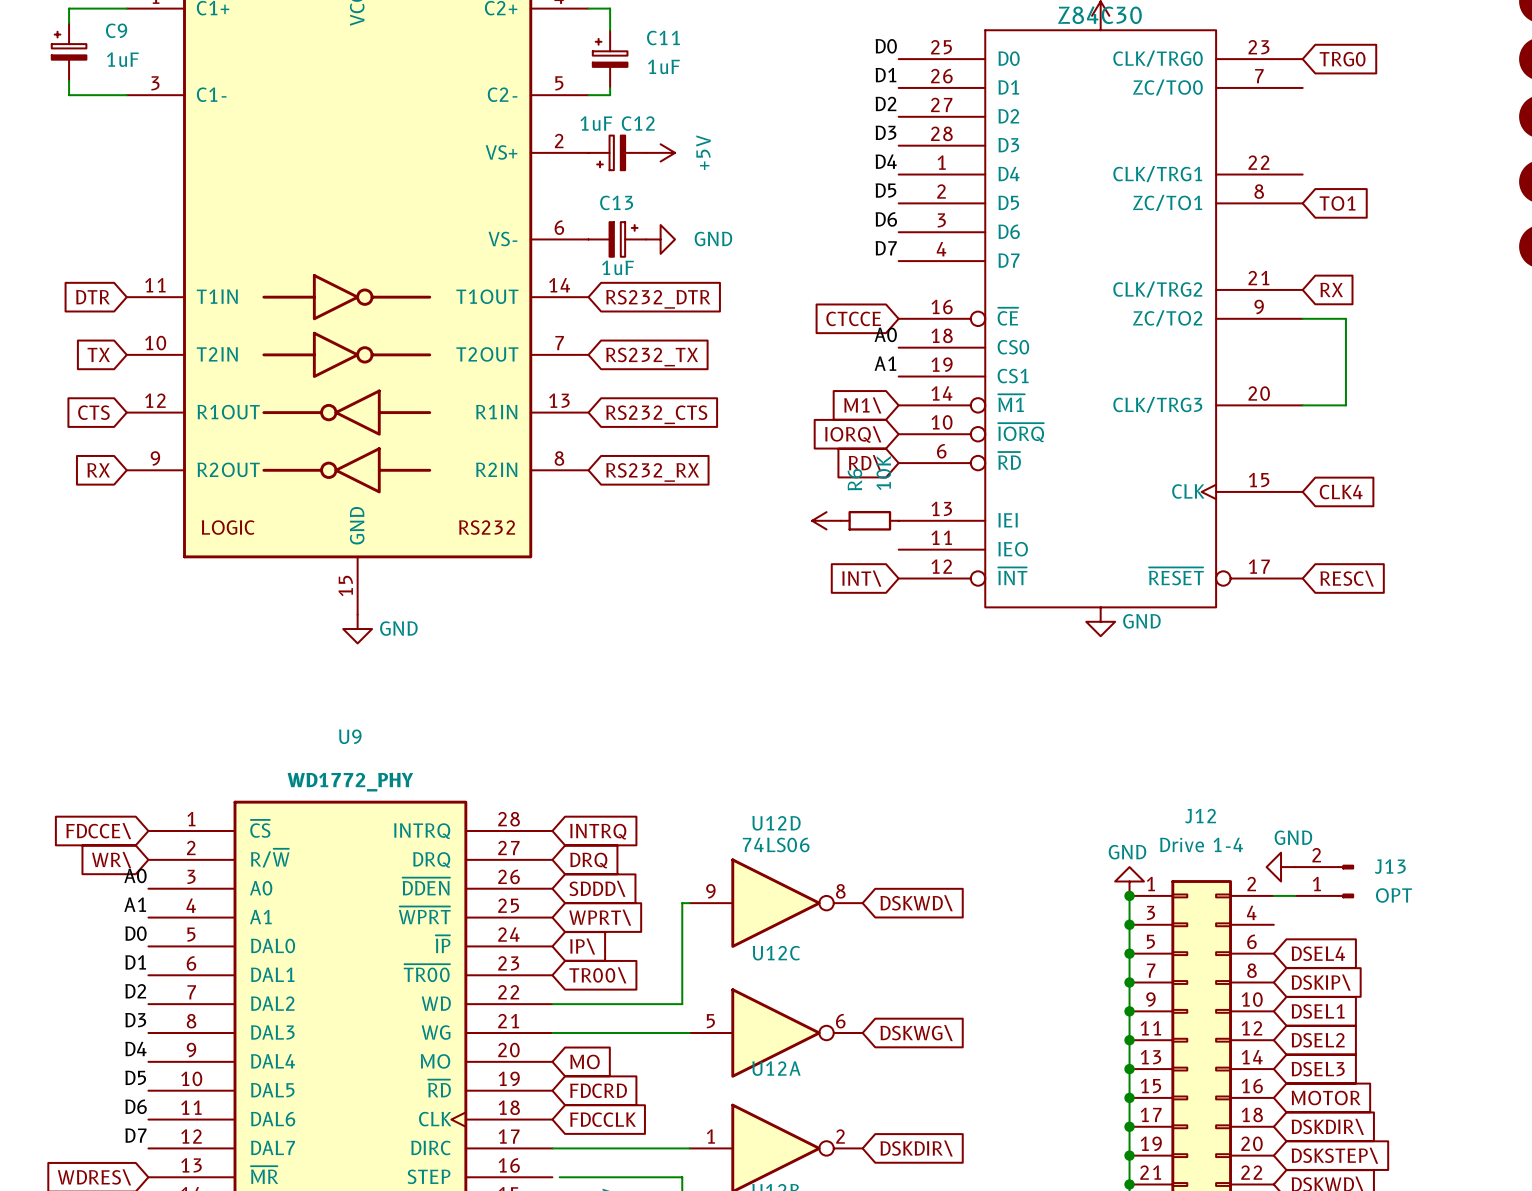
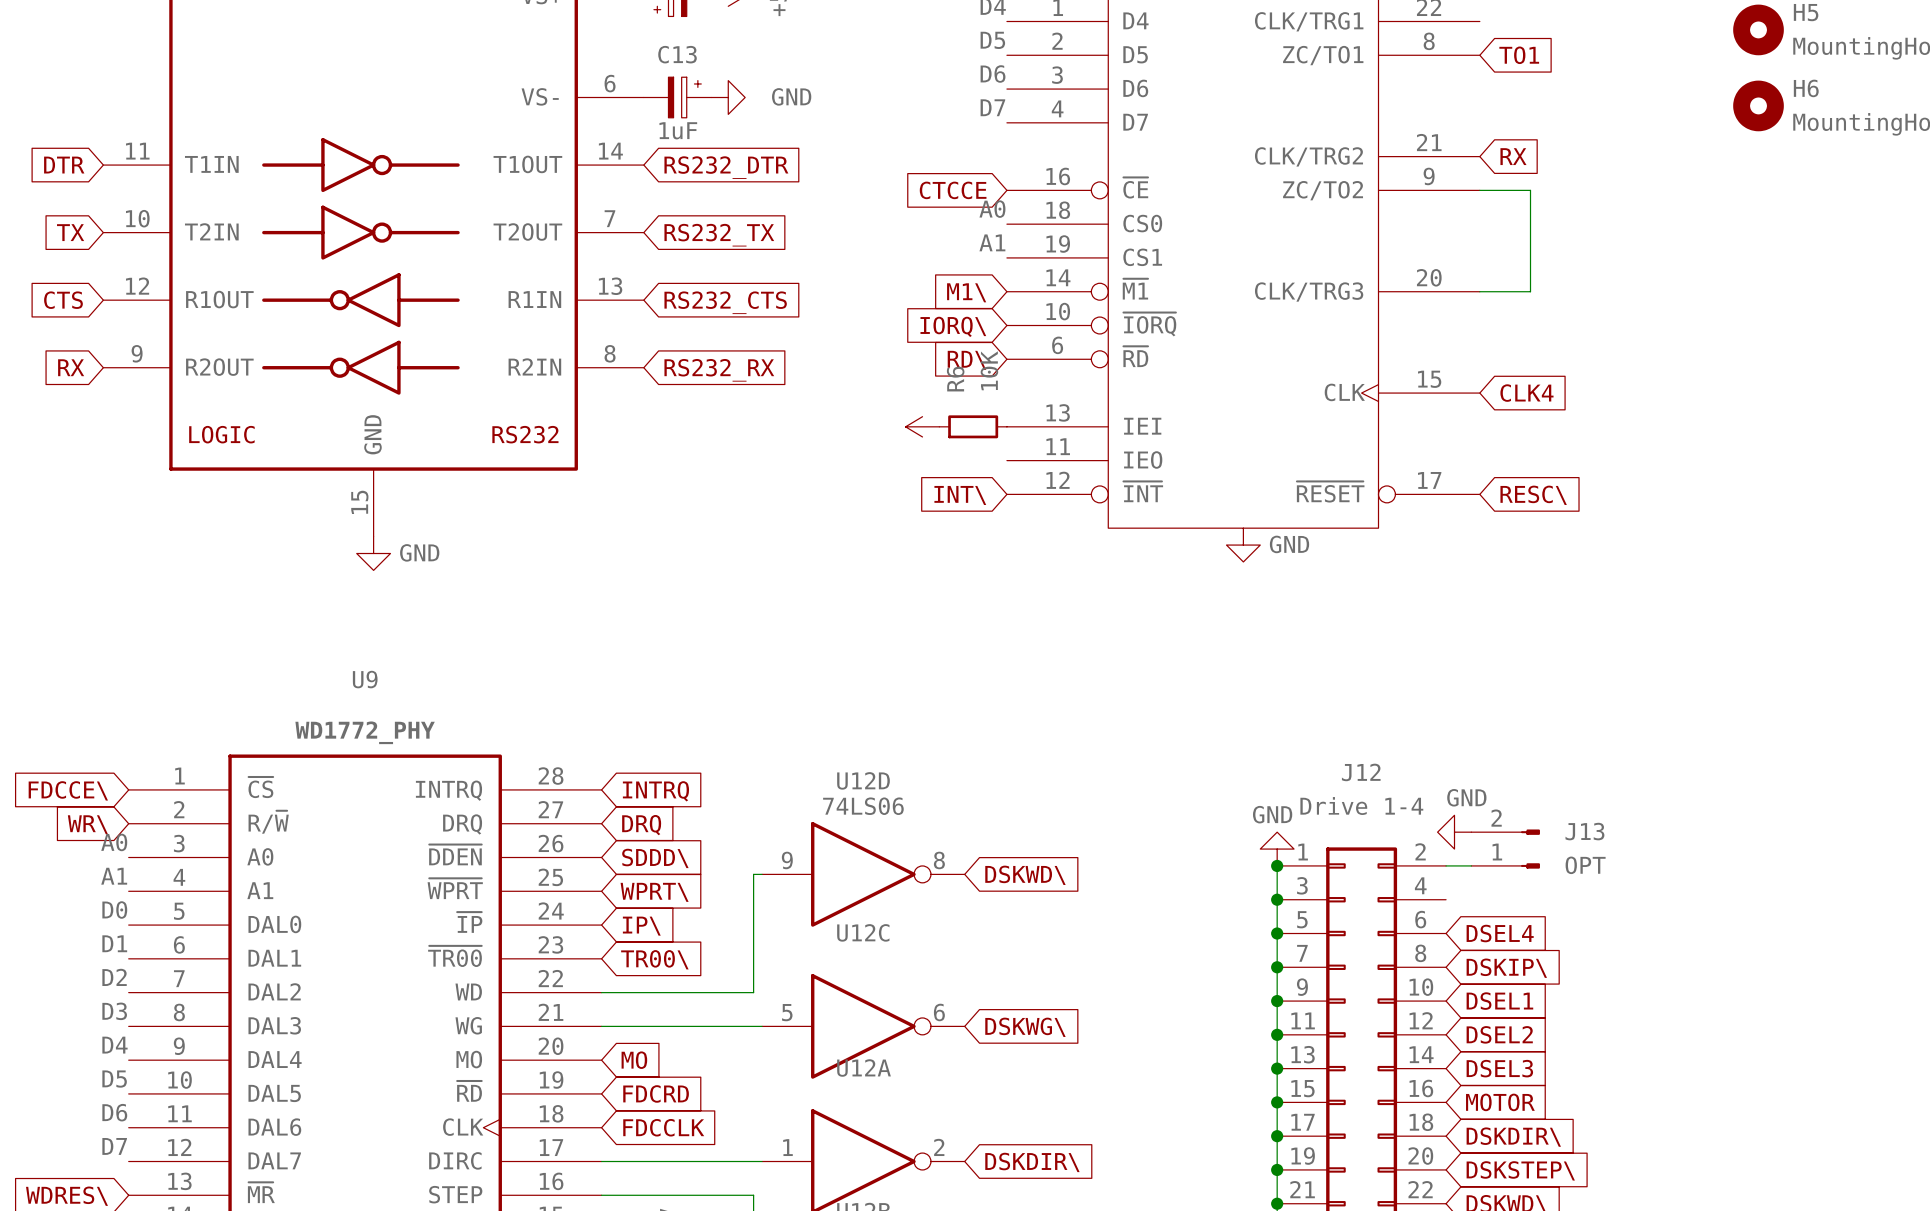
wire: none -> (601, 1195) (610, 1195)

